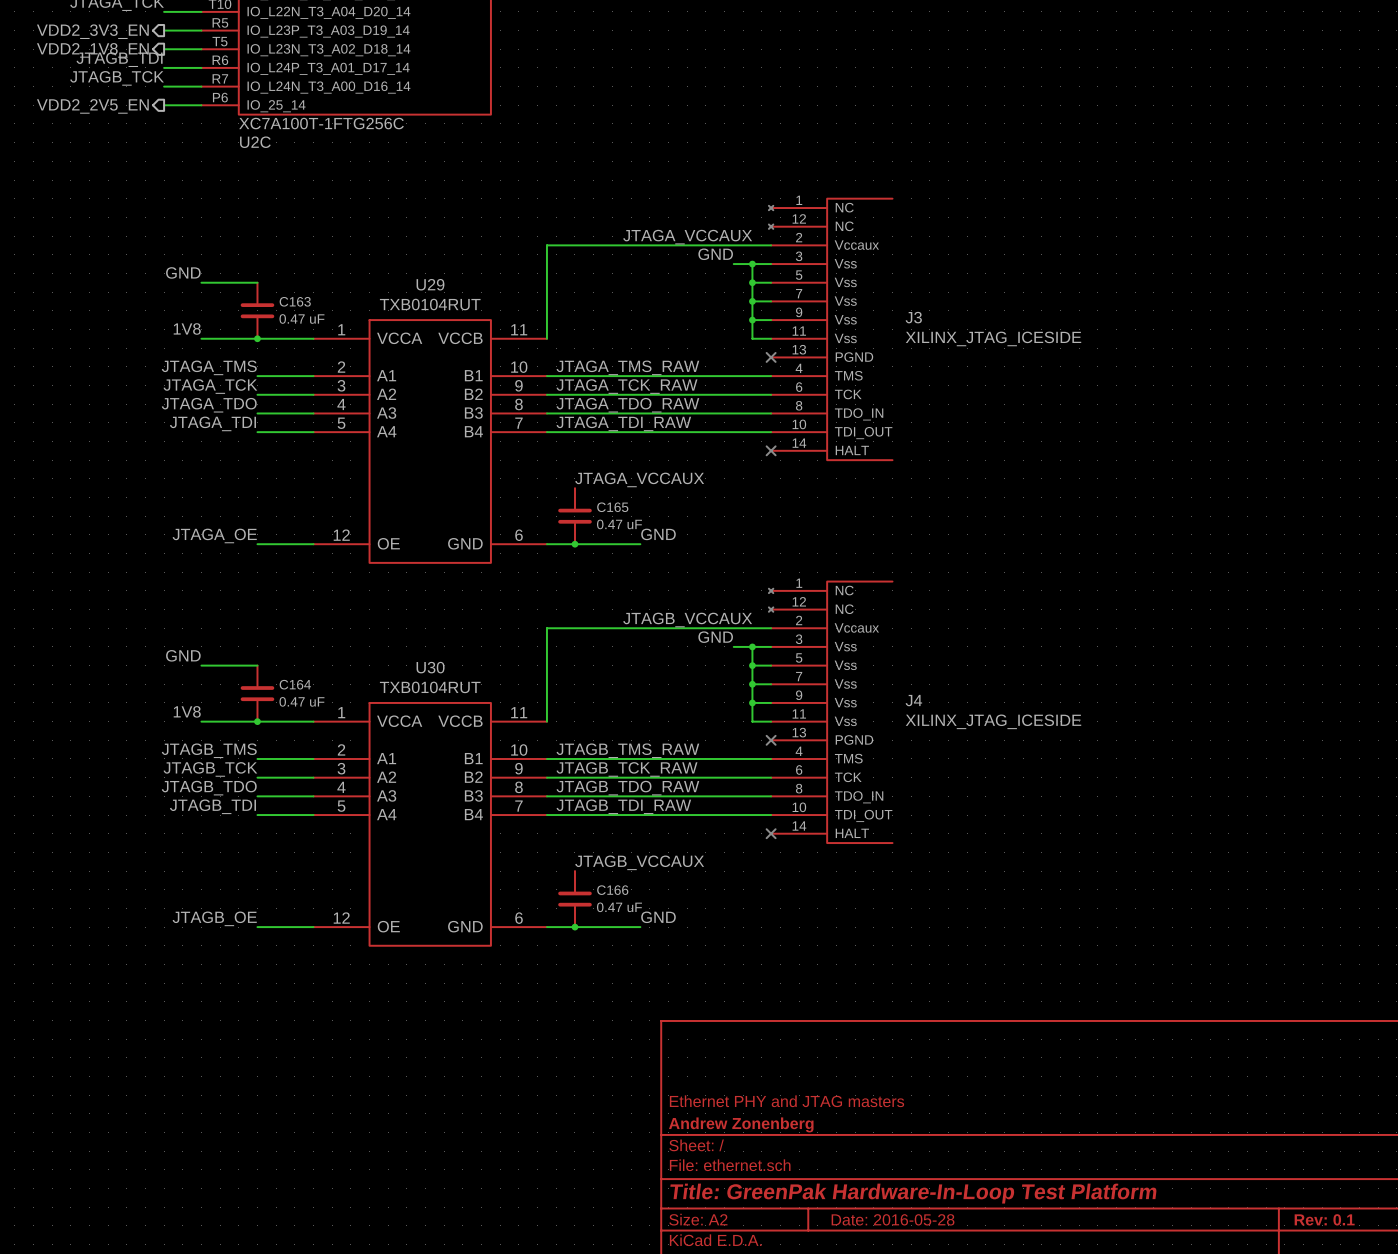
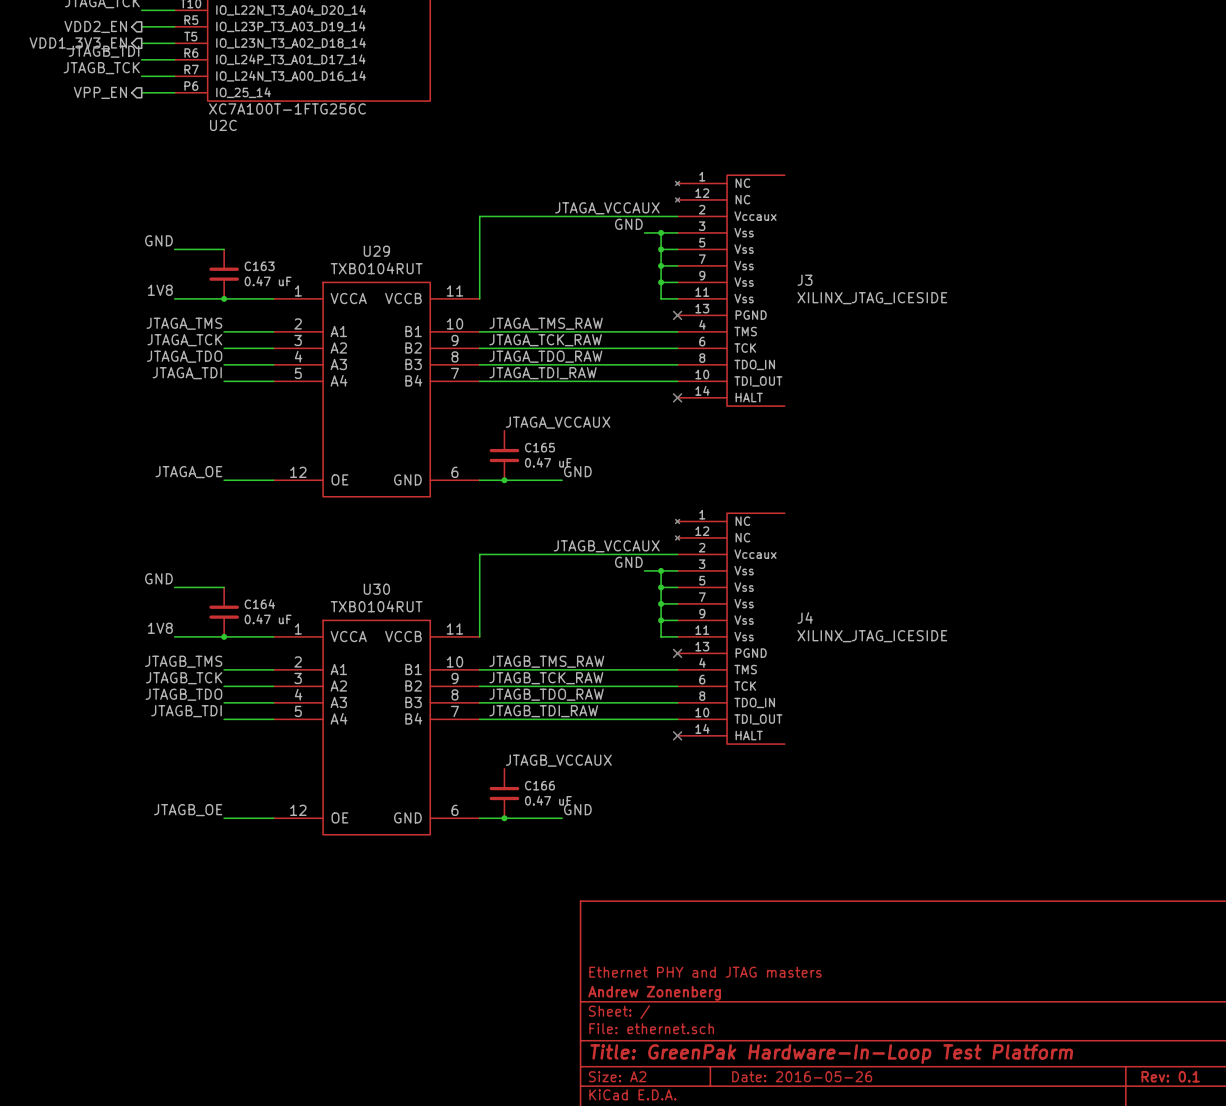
hierarchical label: VDD2_3V3_EN (92, 31) -> VDD2_EN (95, 26)
hierarchical label: VDD2_1V8_EN (92, 50) -> VDD1_3V3_EN (78, 43)
hierarchical label: VDD2_2V5_EN (92, 106) -> VPP_EN (100, 92)
title block: Date: 2016-05-28 (893, 1219) -> Date: 2016-05-26 (802, 1076)

